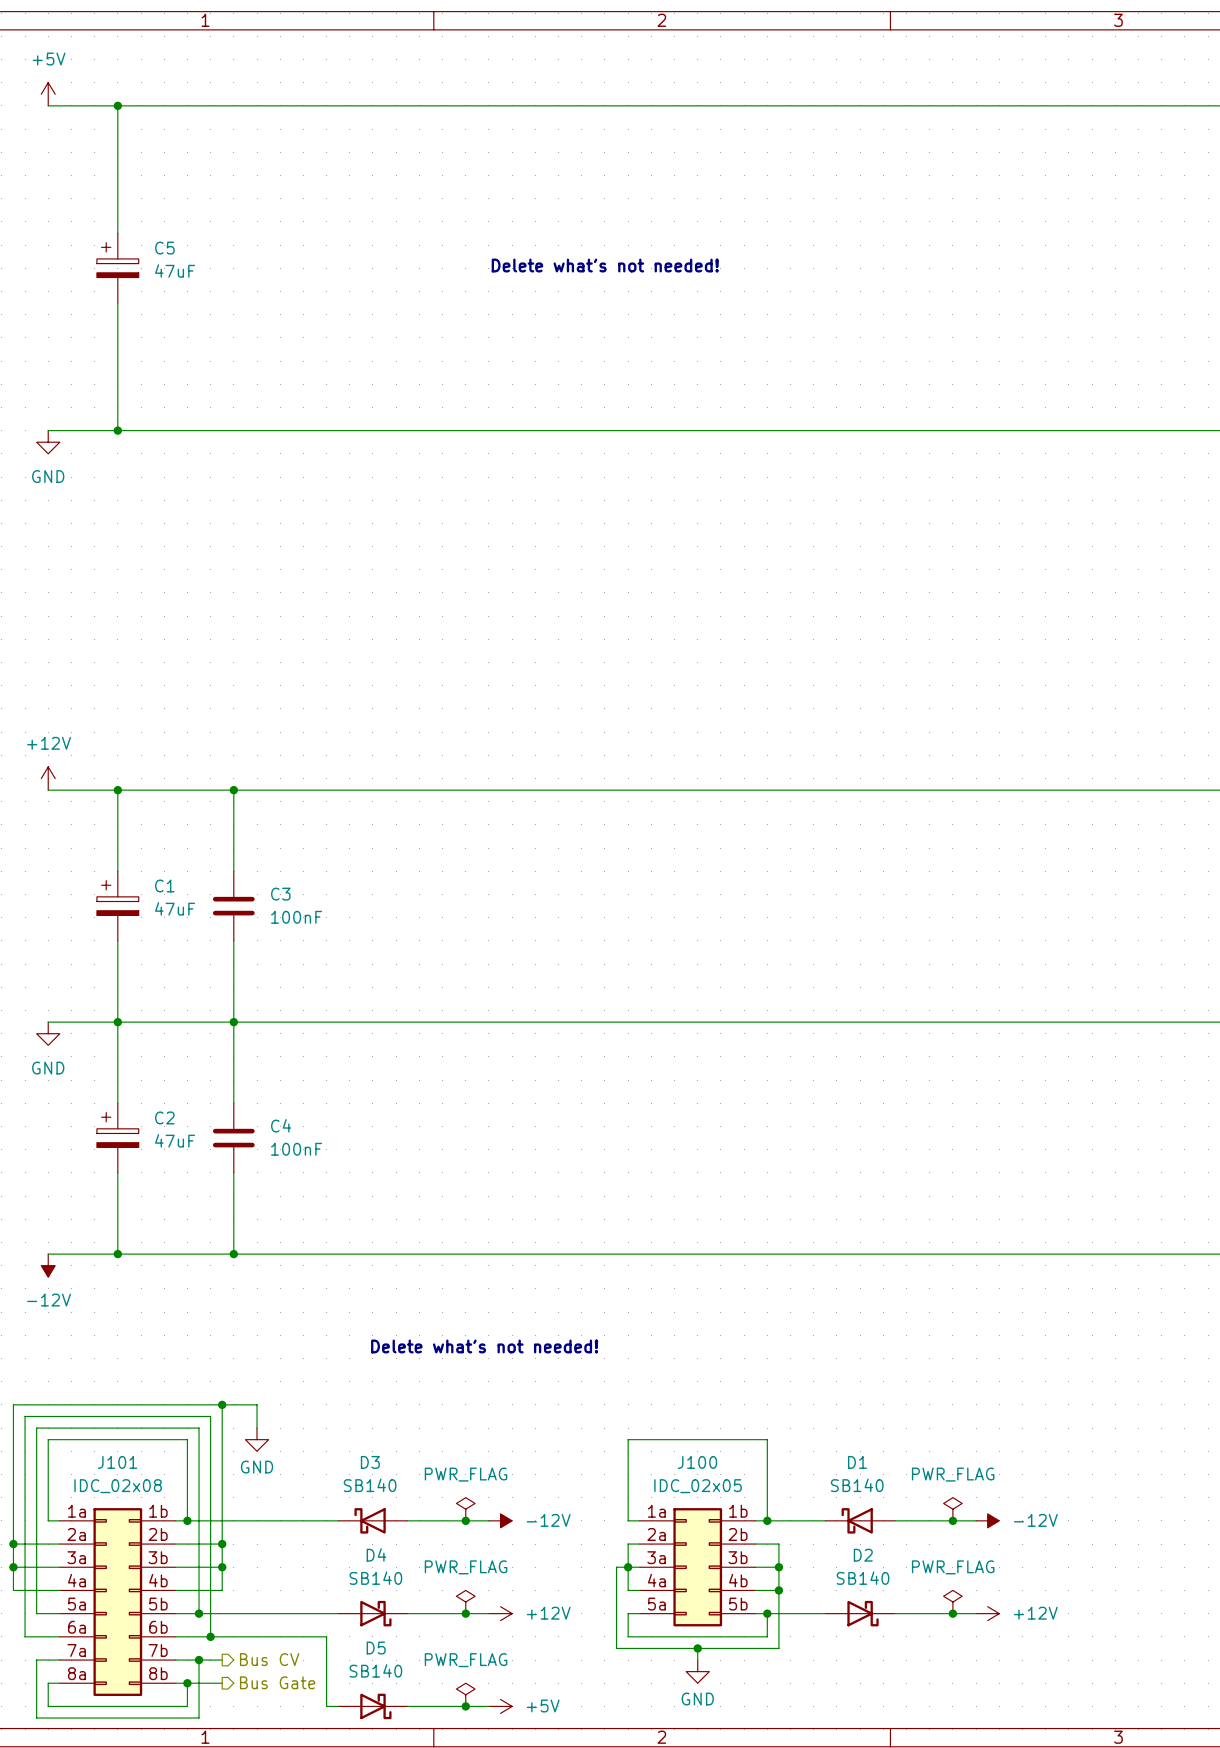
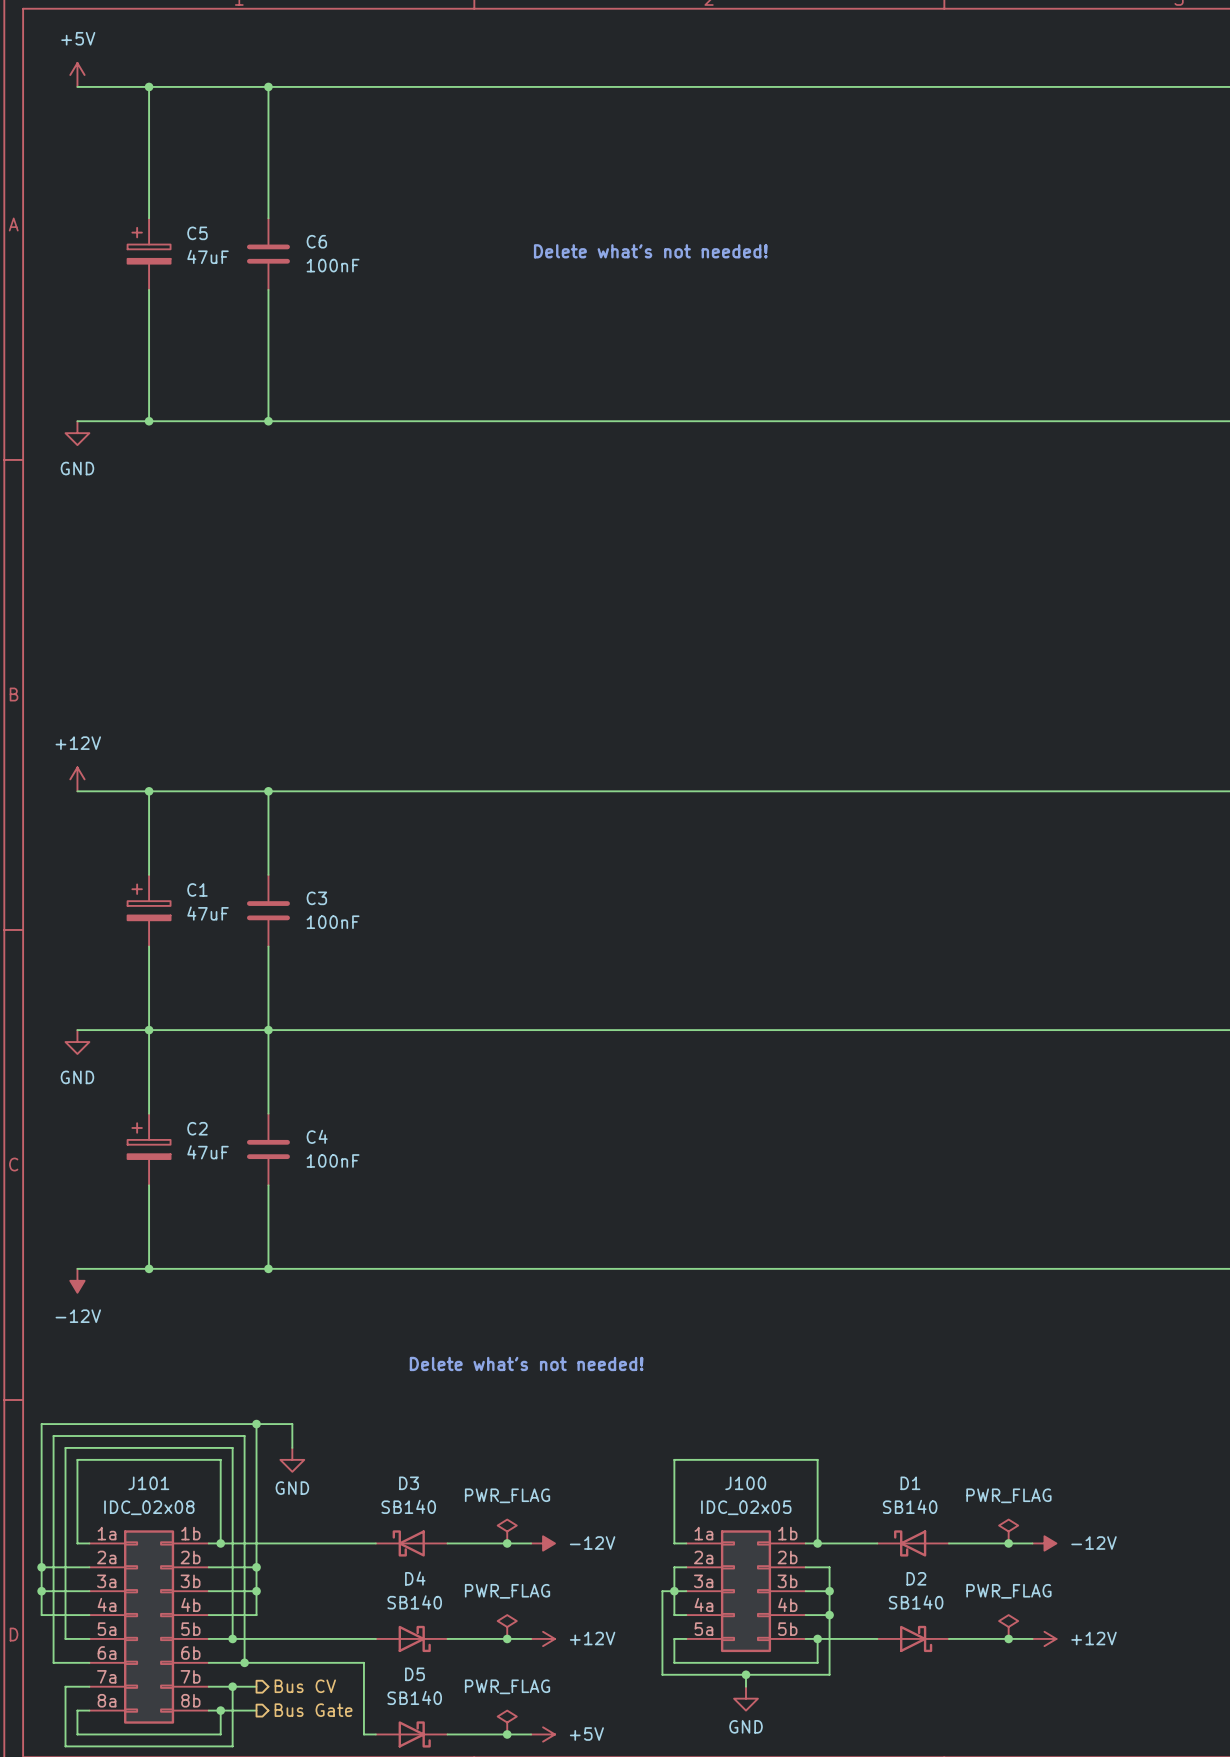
wire: none -> (268, 86) (268, 218)
junction: none -> (268, 86)
C6: none -> 100nF (268, 254)
wire: none -> (268, 289) (268, 421)
junction: none -> (268, 421)

